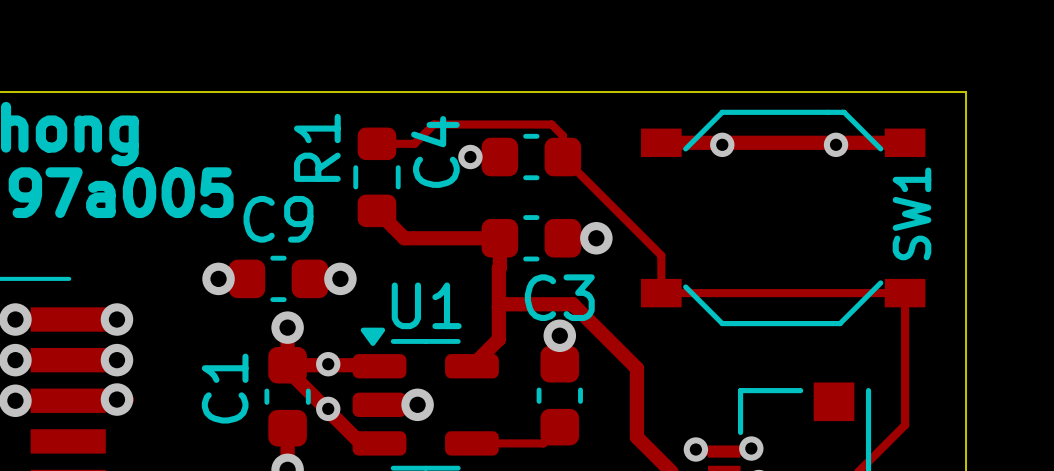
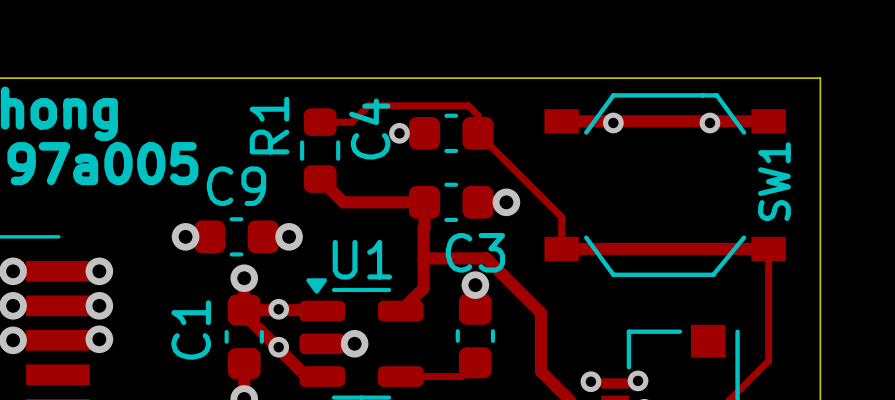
SW1 footprint: [641, 109, 926, 327] -> [544, 93, 786, 277]
track width: thin (661, 293) (905, 293) -> thick (561, 248) (768, 248)

